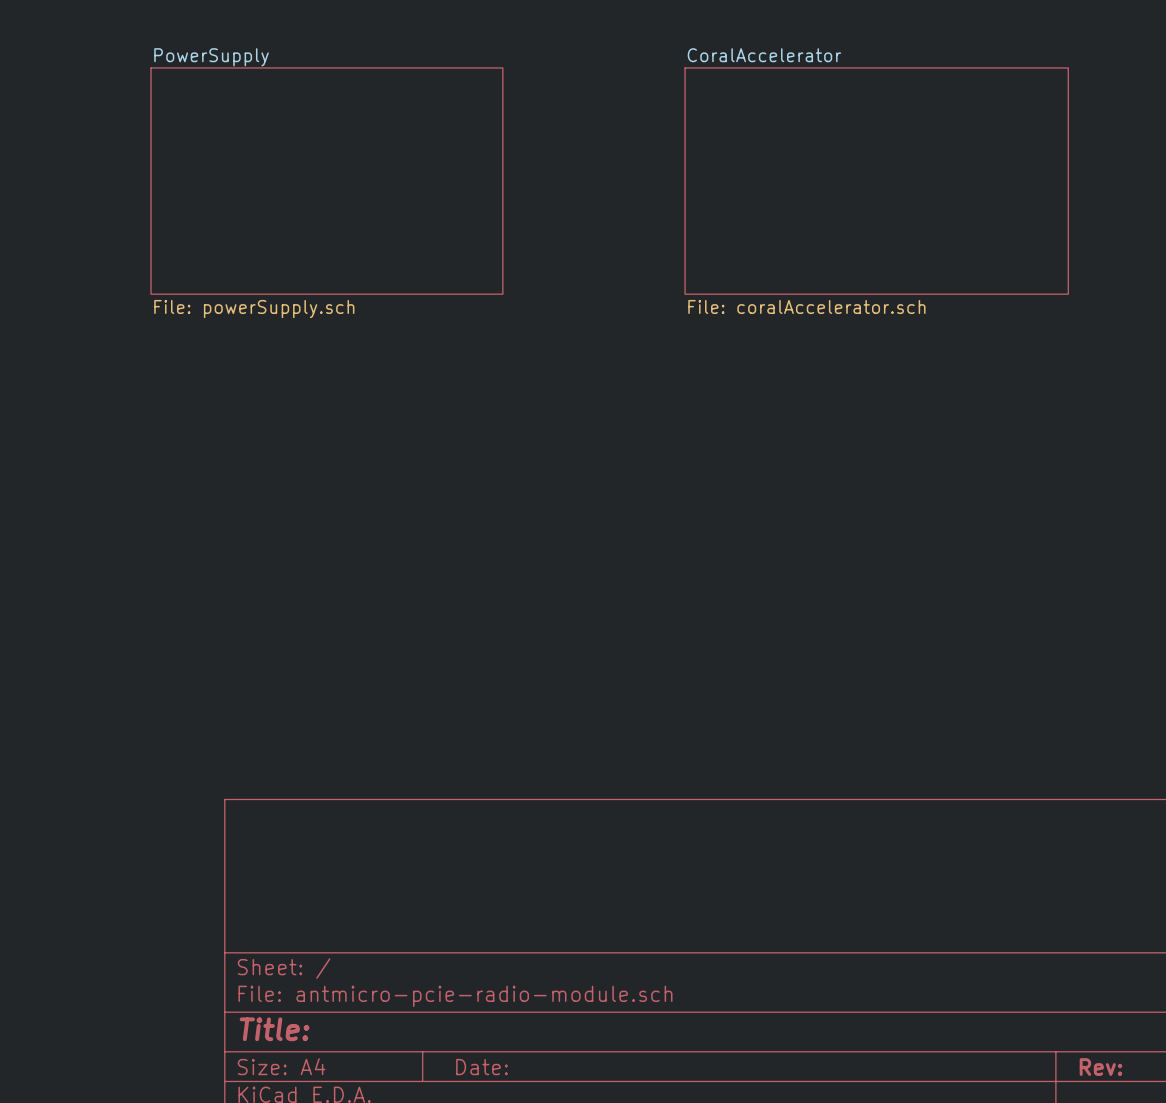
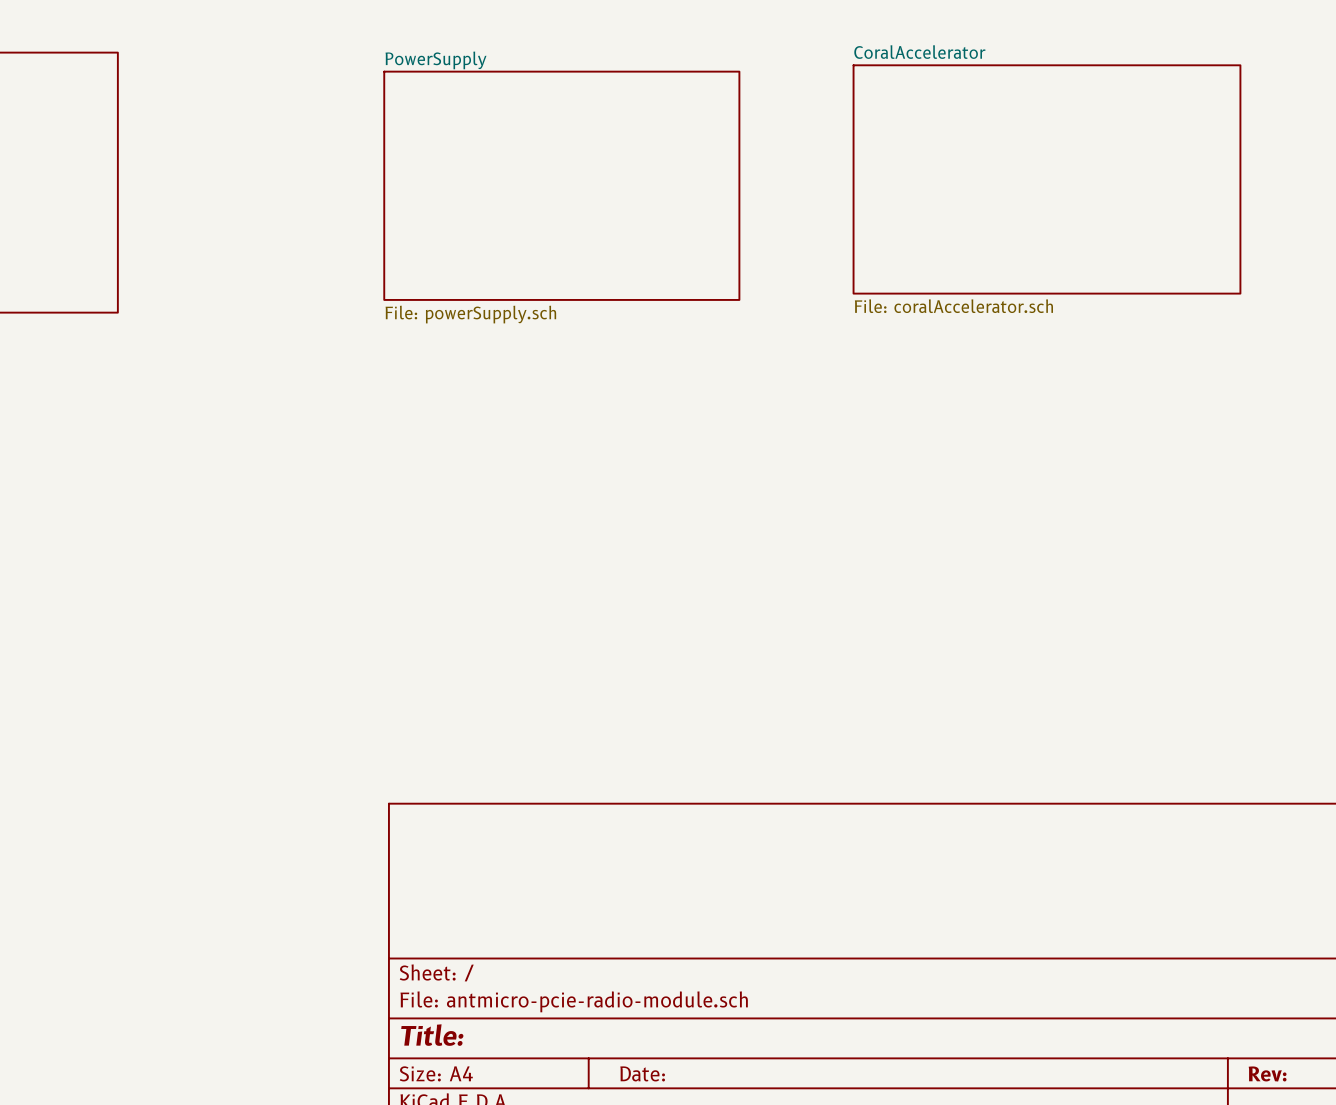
sheet PowerSupply position: (326, 181) -> (561, 185)

